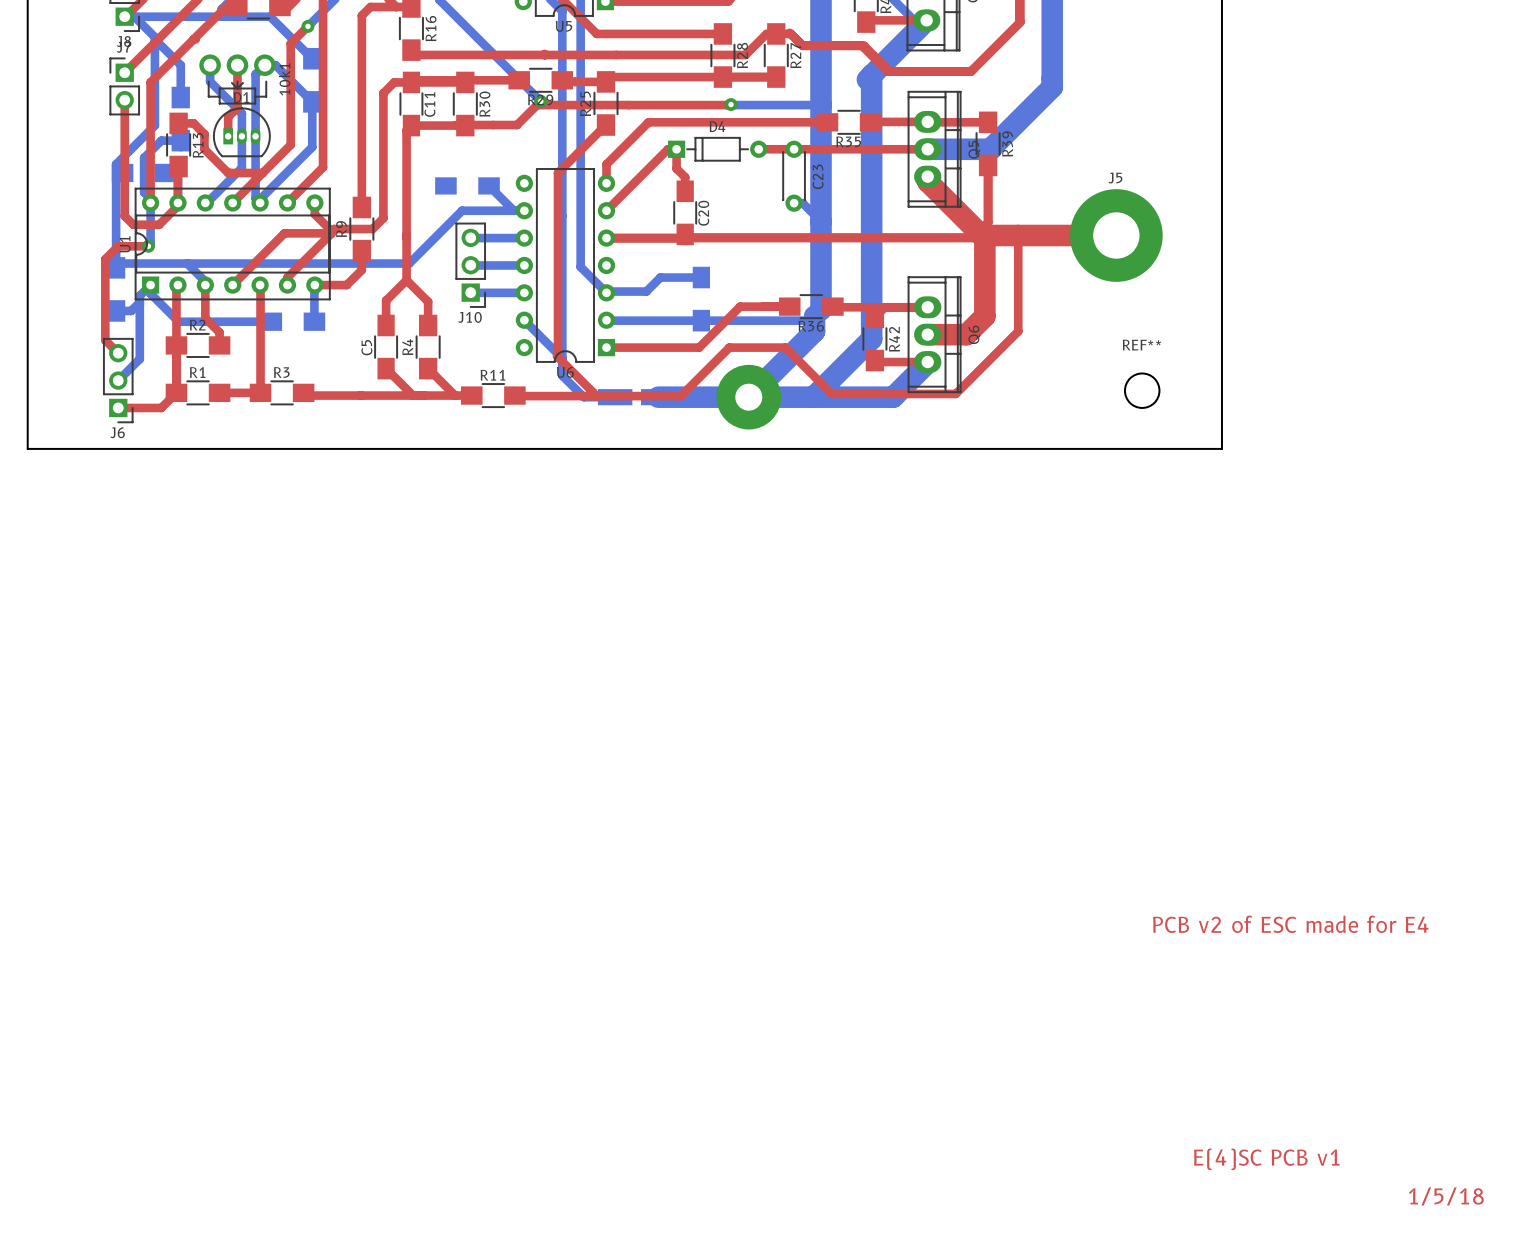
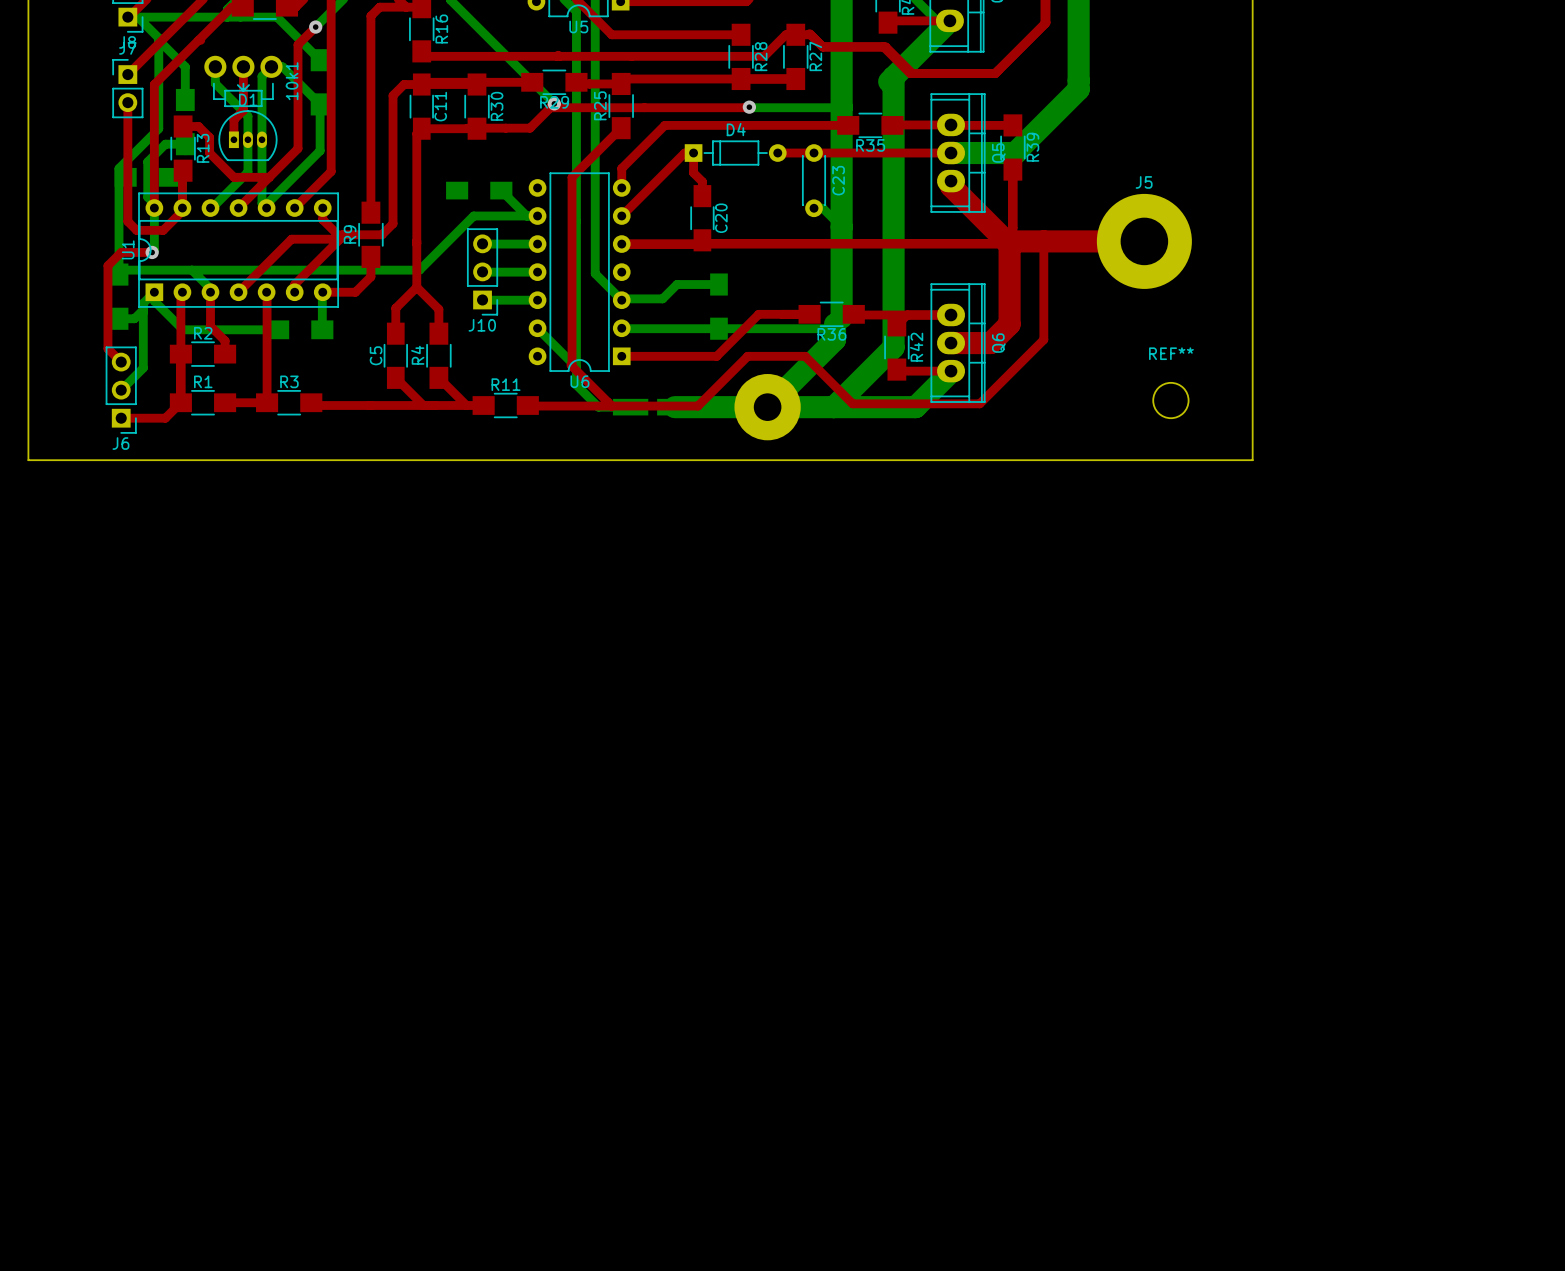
text: PCB v2 of ESC made for E4 (1290, 924) -> none
text: E(4)SC PCB v1 (1266, 1159) -> none
text: 1/5/18 (1446, 1196) -> none

